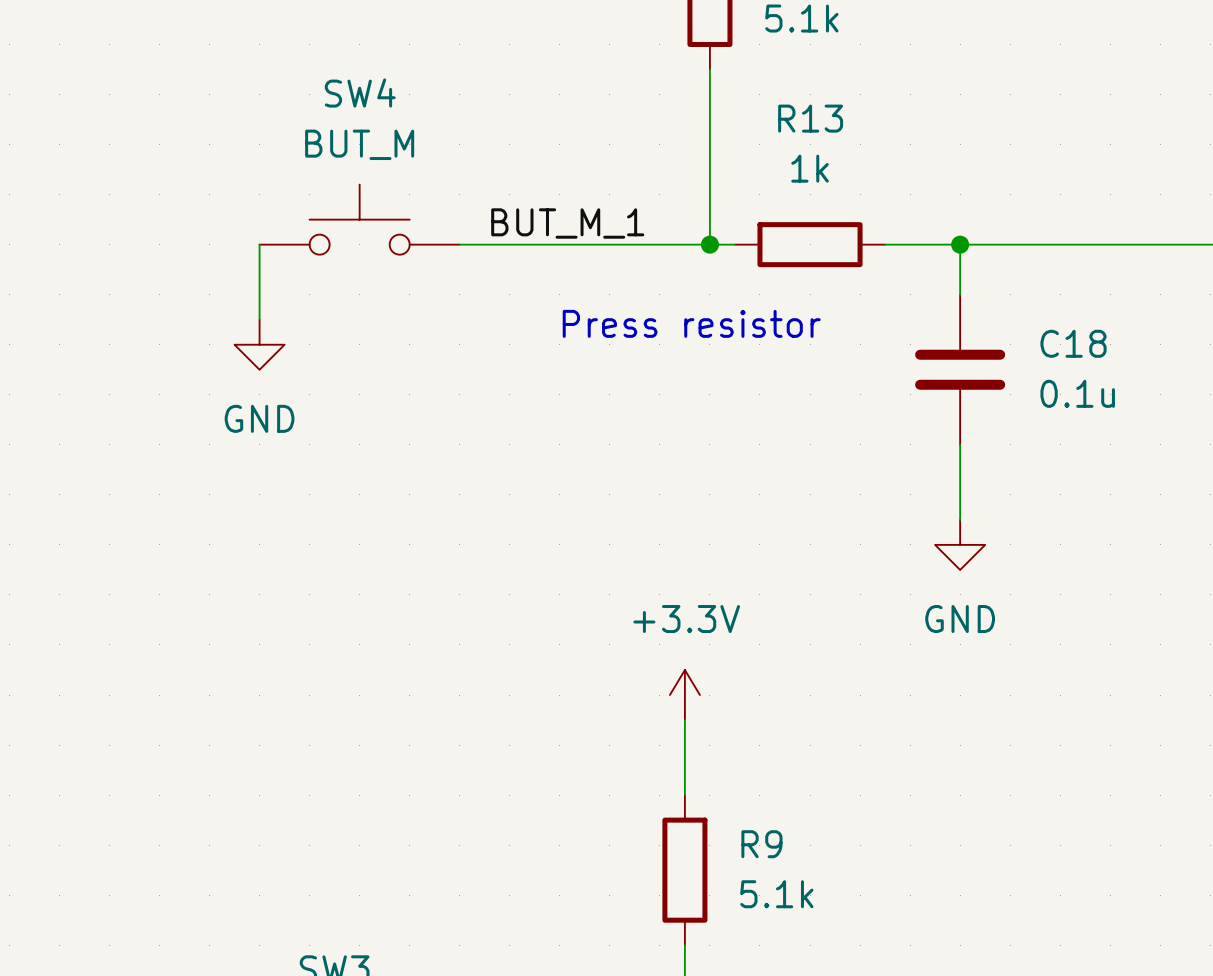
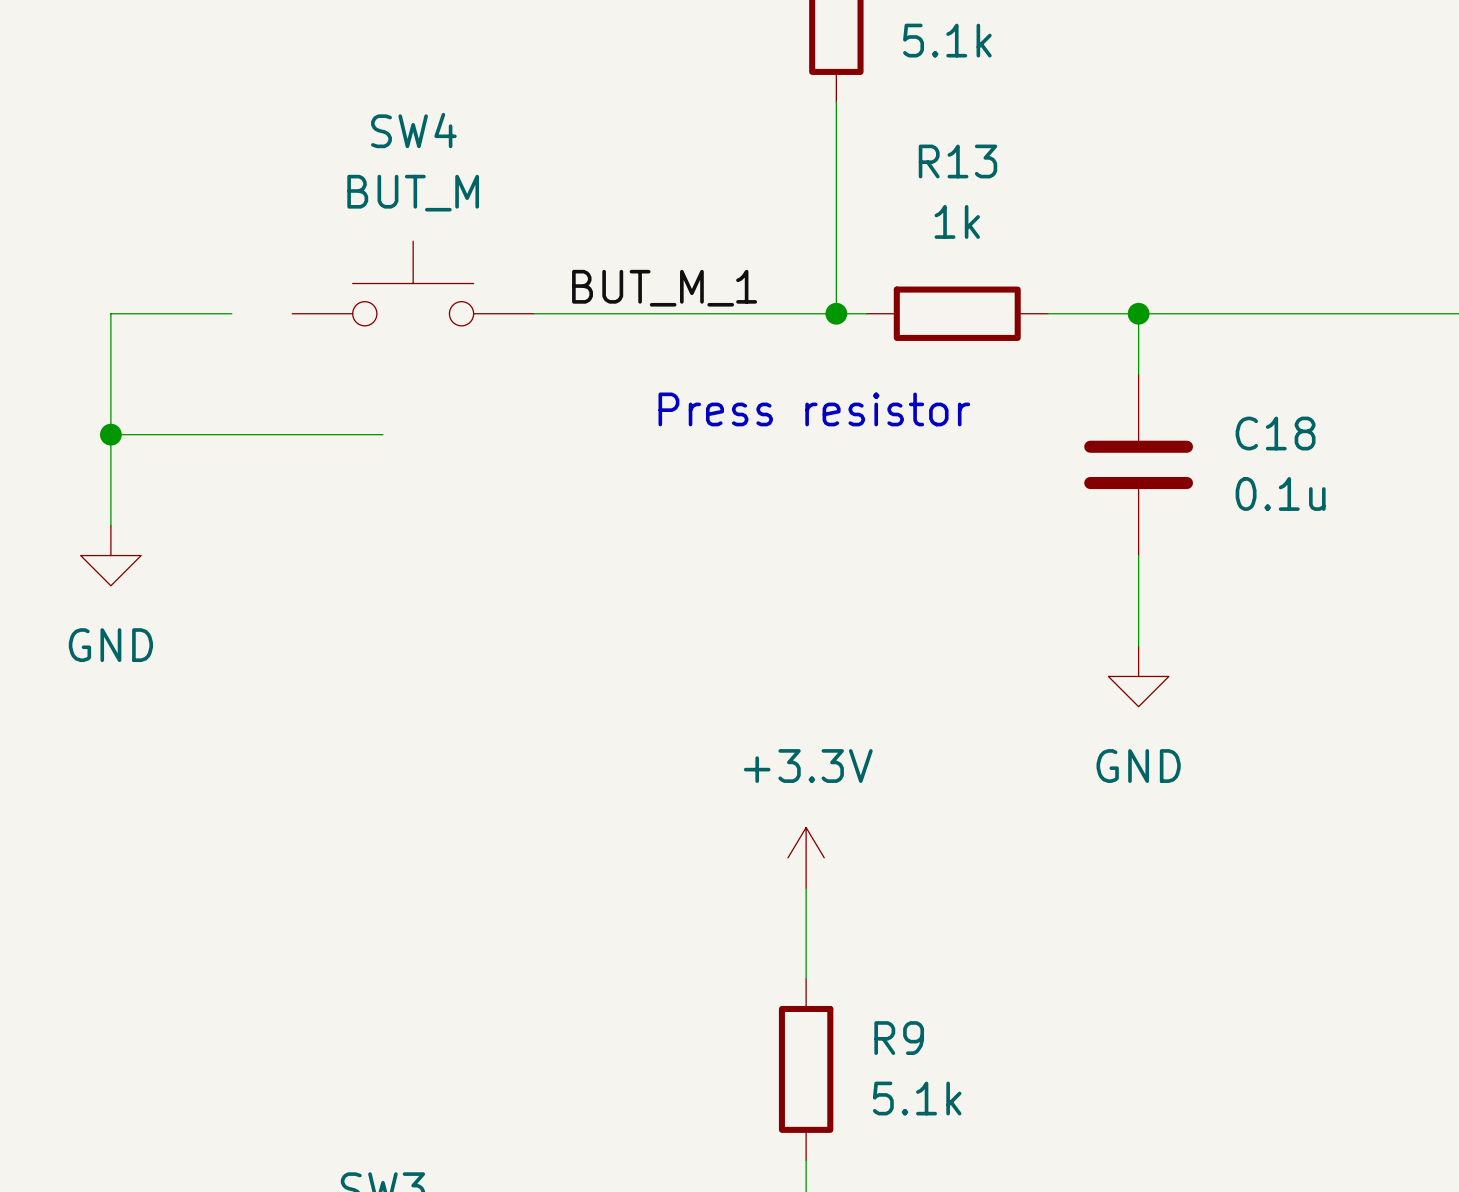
wire: none -> (231, 313) (110, 313) (110, 525)
wire: (259, 244) (259, 319) -> none
wire: none -> (110, 434) (382, 434)
junction: none -> (110, 434)
power symbol position: GND (259, 344) -> GND (110, 555)

